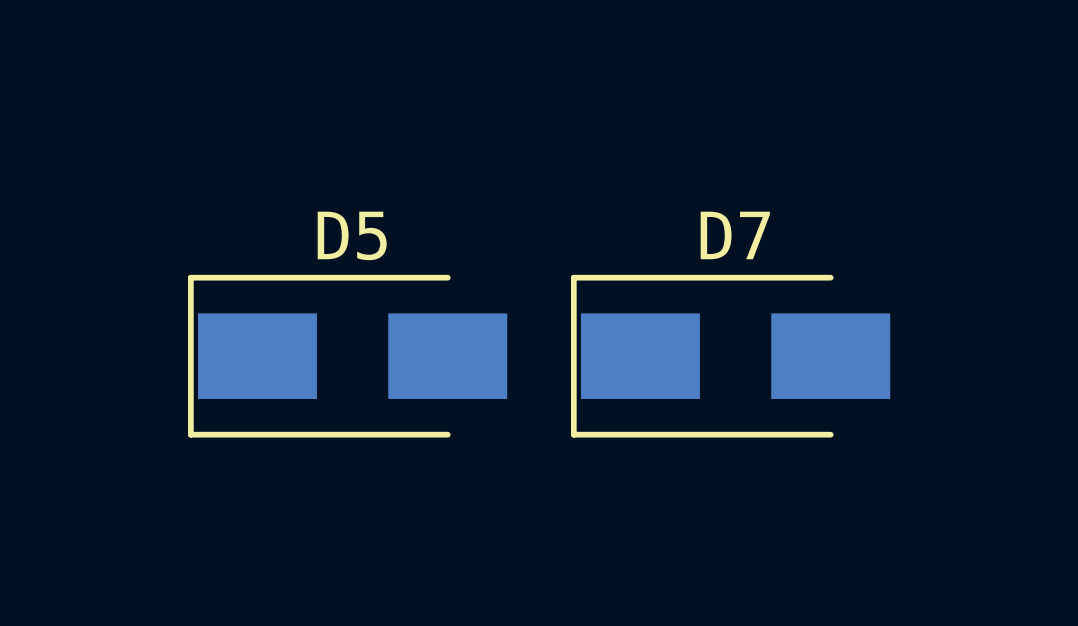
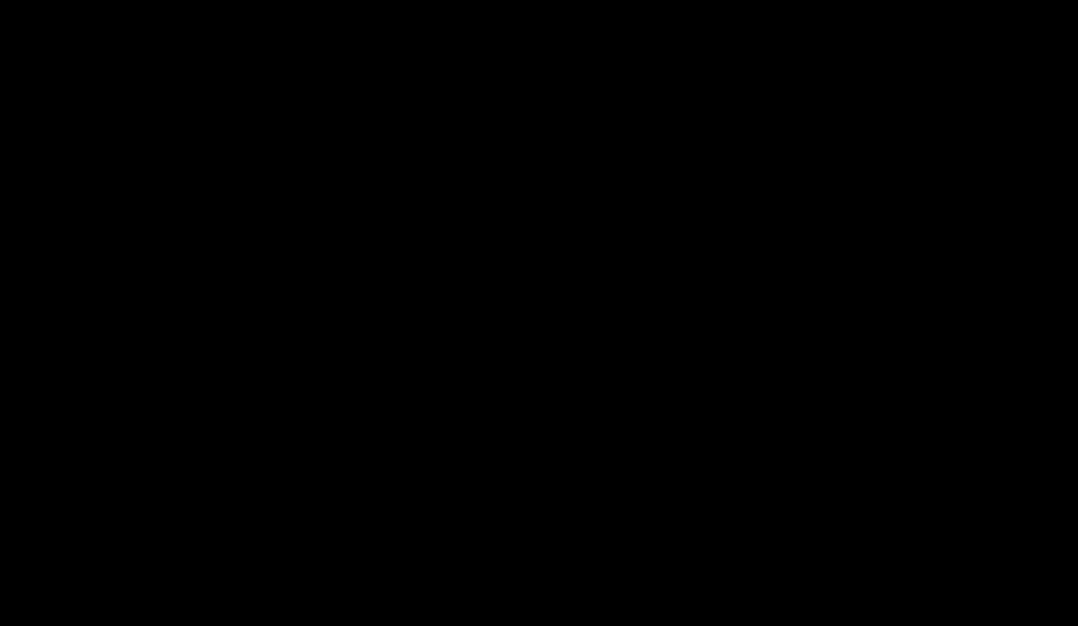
D5: (347, 356) -> none
D7: (730, 356) -> none

